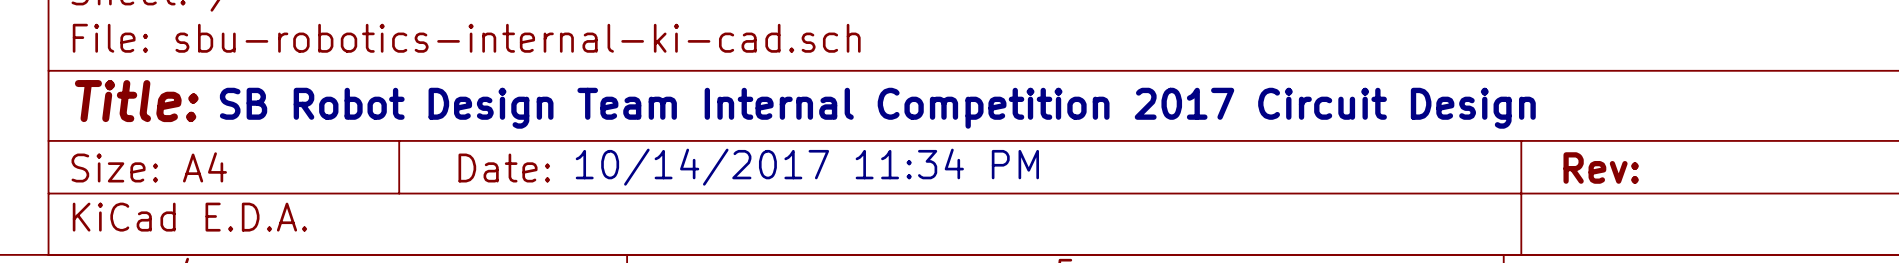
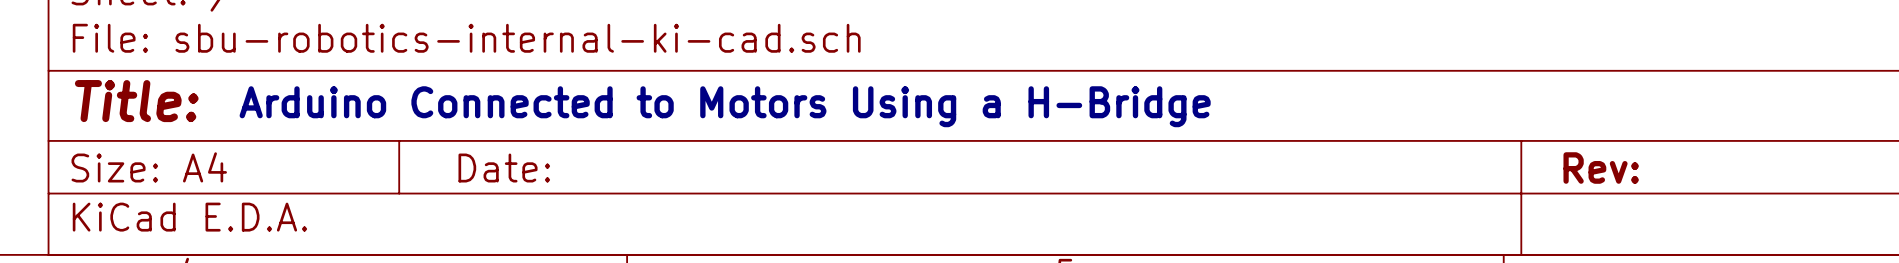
text: none -> Arduino Connected to Motors Using a H-Bridge (725, 106)
text: SB Robot Design Team Internal Competition 2017 Circuit Design (877, 108) -> none
text: 10/14/2017 11:34 PM (807, 167) -> none

